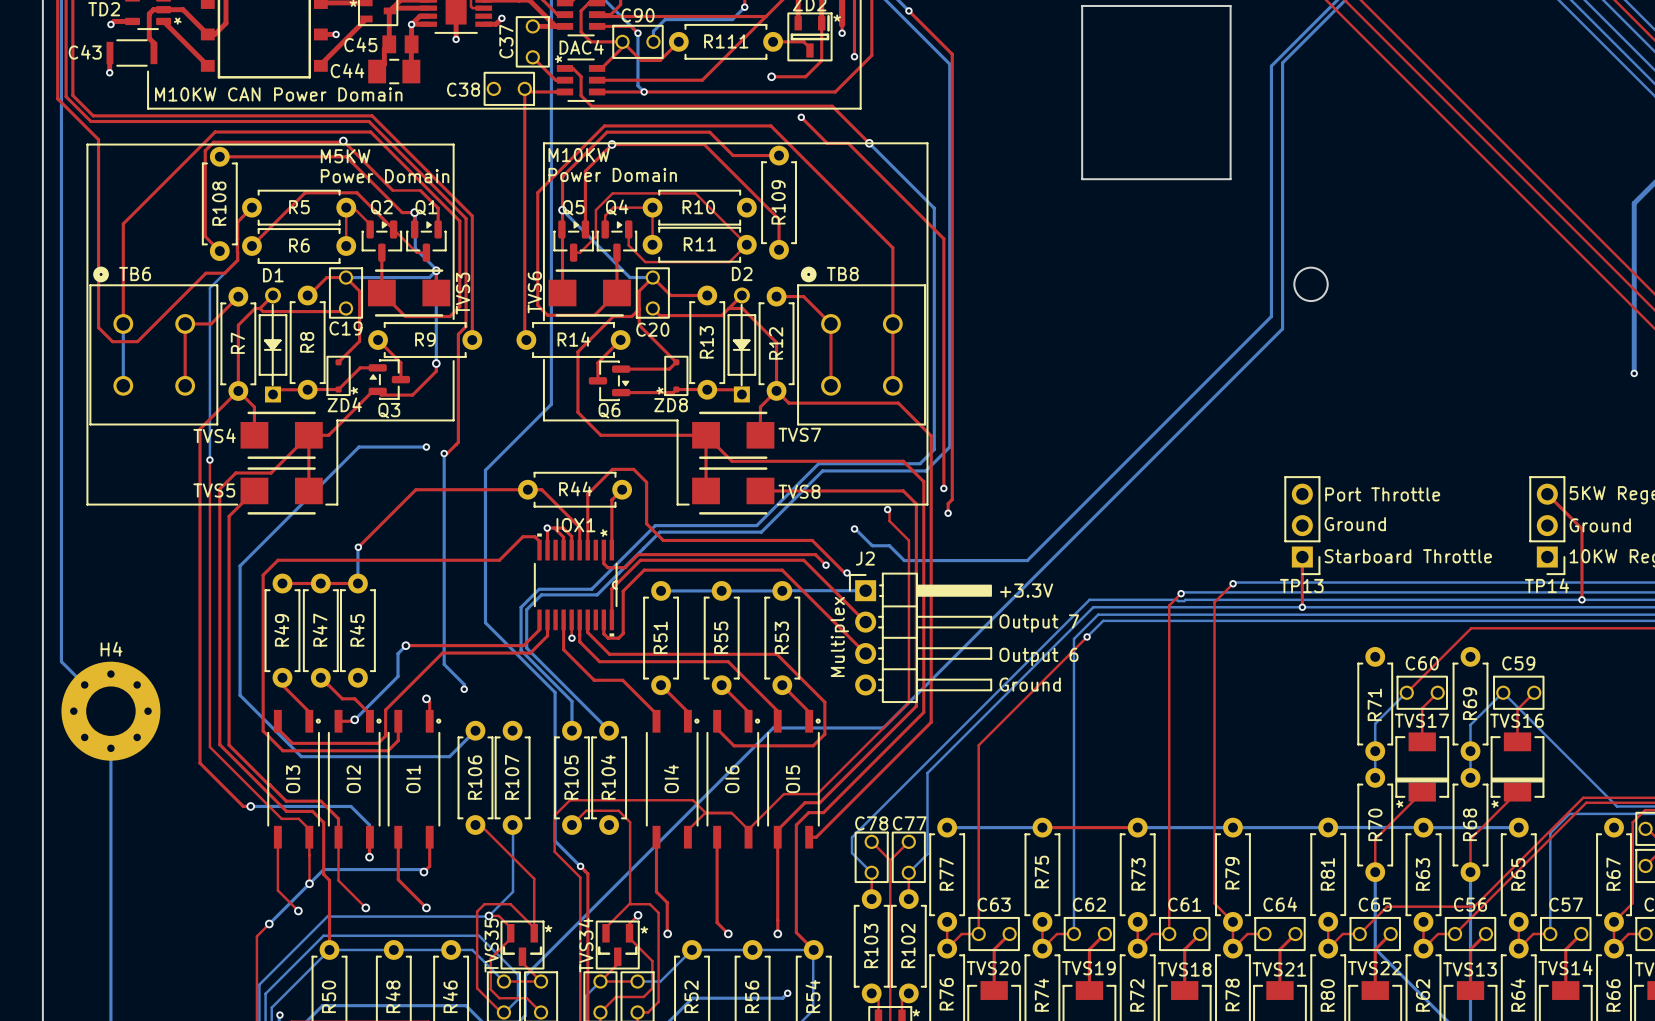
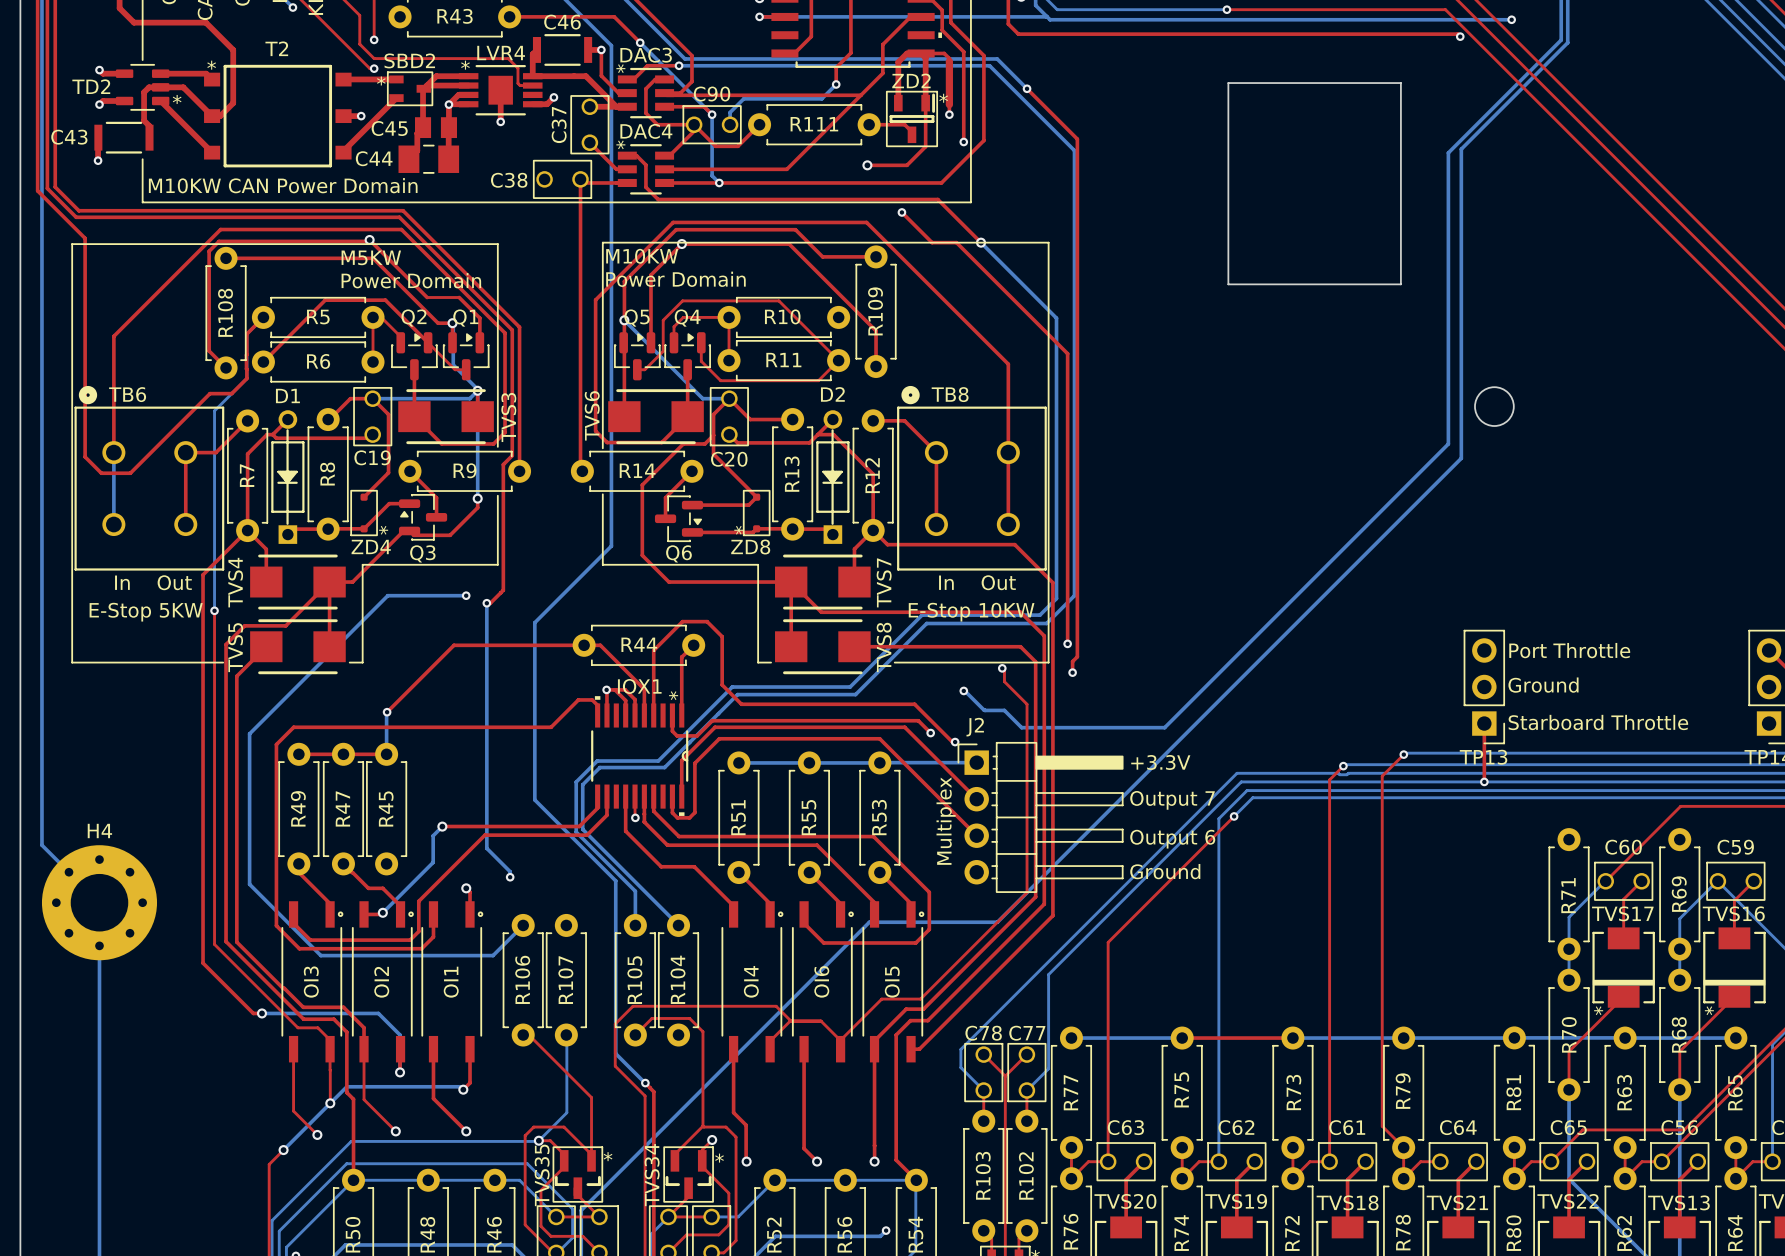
TVS7 name rotation: 0° (799, 434) -> 90° counterclockwise (884, 582)
text: none -> In Out (153, 582)
TVS4 name rotation: 0° (214, 435) -> 90° counterclockwise (235, 582)
text: none -> In Out (977, 582)
text: none -> E-Stop 5KW (146, 612)
text: none -> E-Stop 10KW (971, 612)
TVS5 name rotation: 0° (214, 490) -> 90° counterclockwise (235, 647)
TVS8 name rotation: 0° (799, 491) -> 90° counterclockwise (884, 647)
line: (217, 504) (237, 504) -> none
line: (777, 504) (795, 504) -> none

